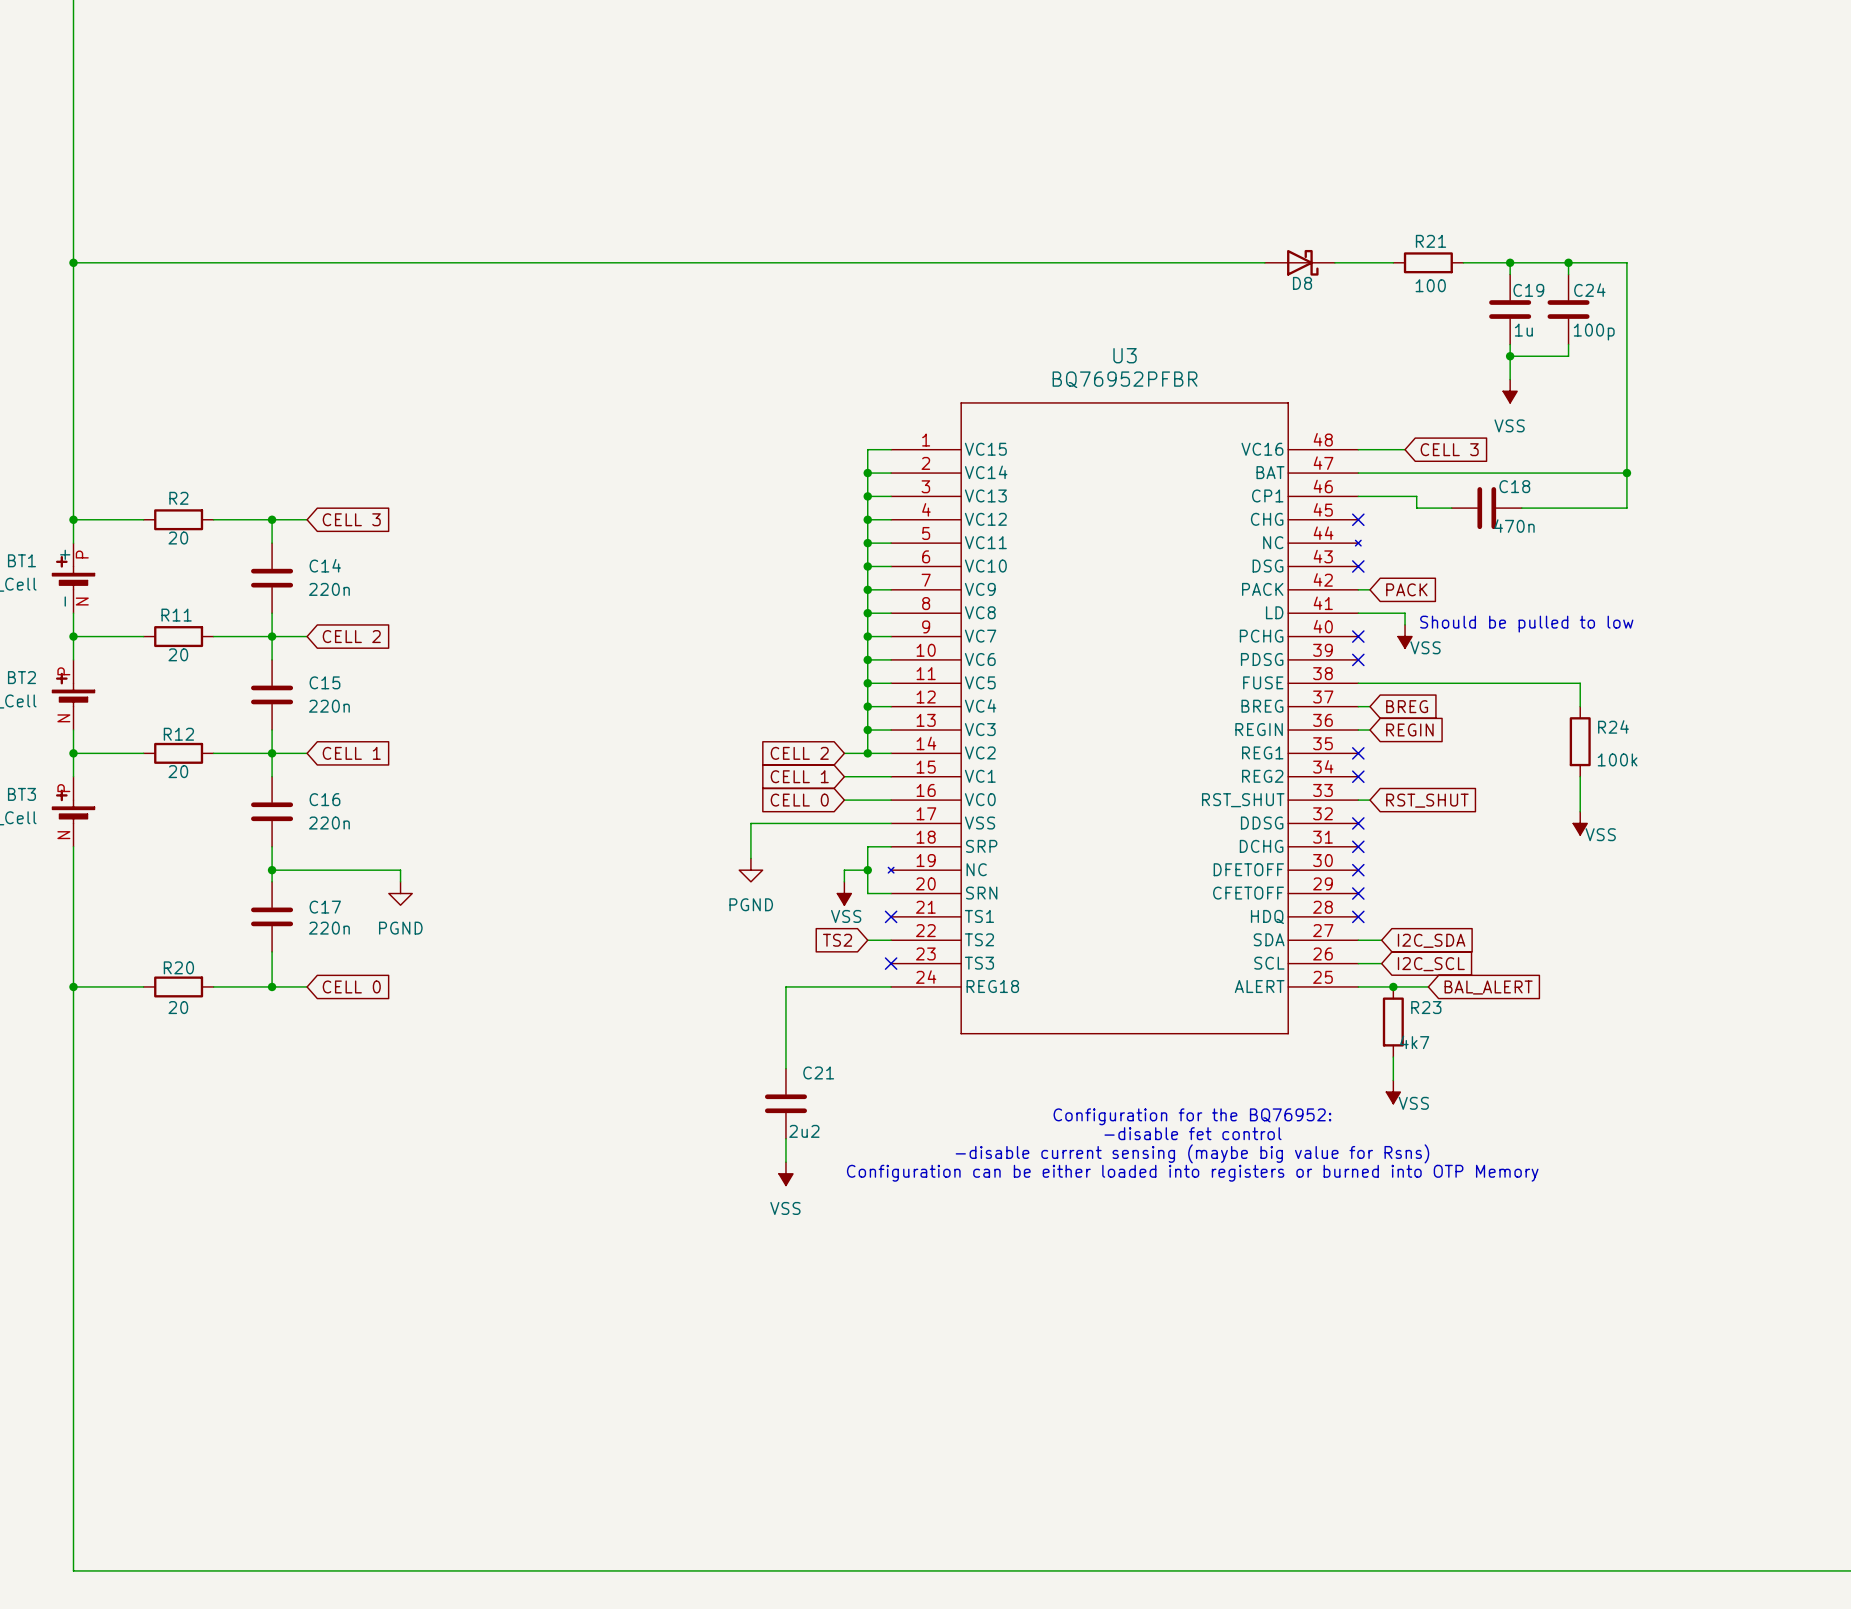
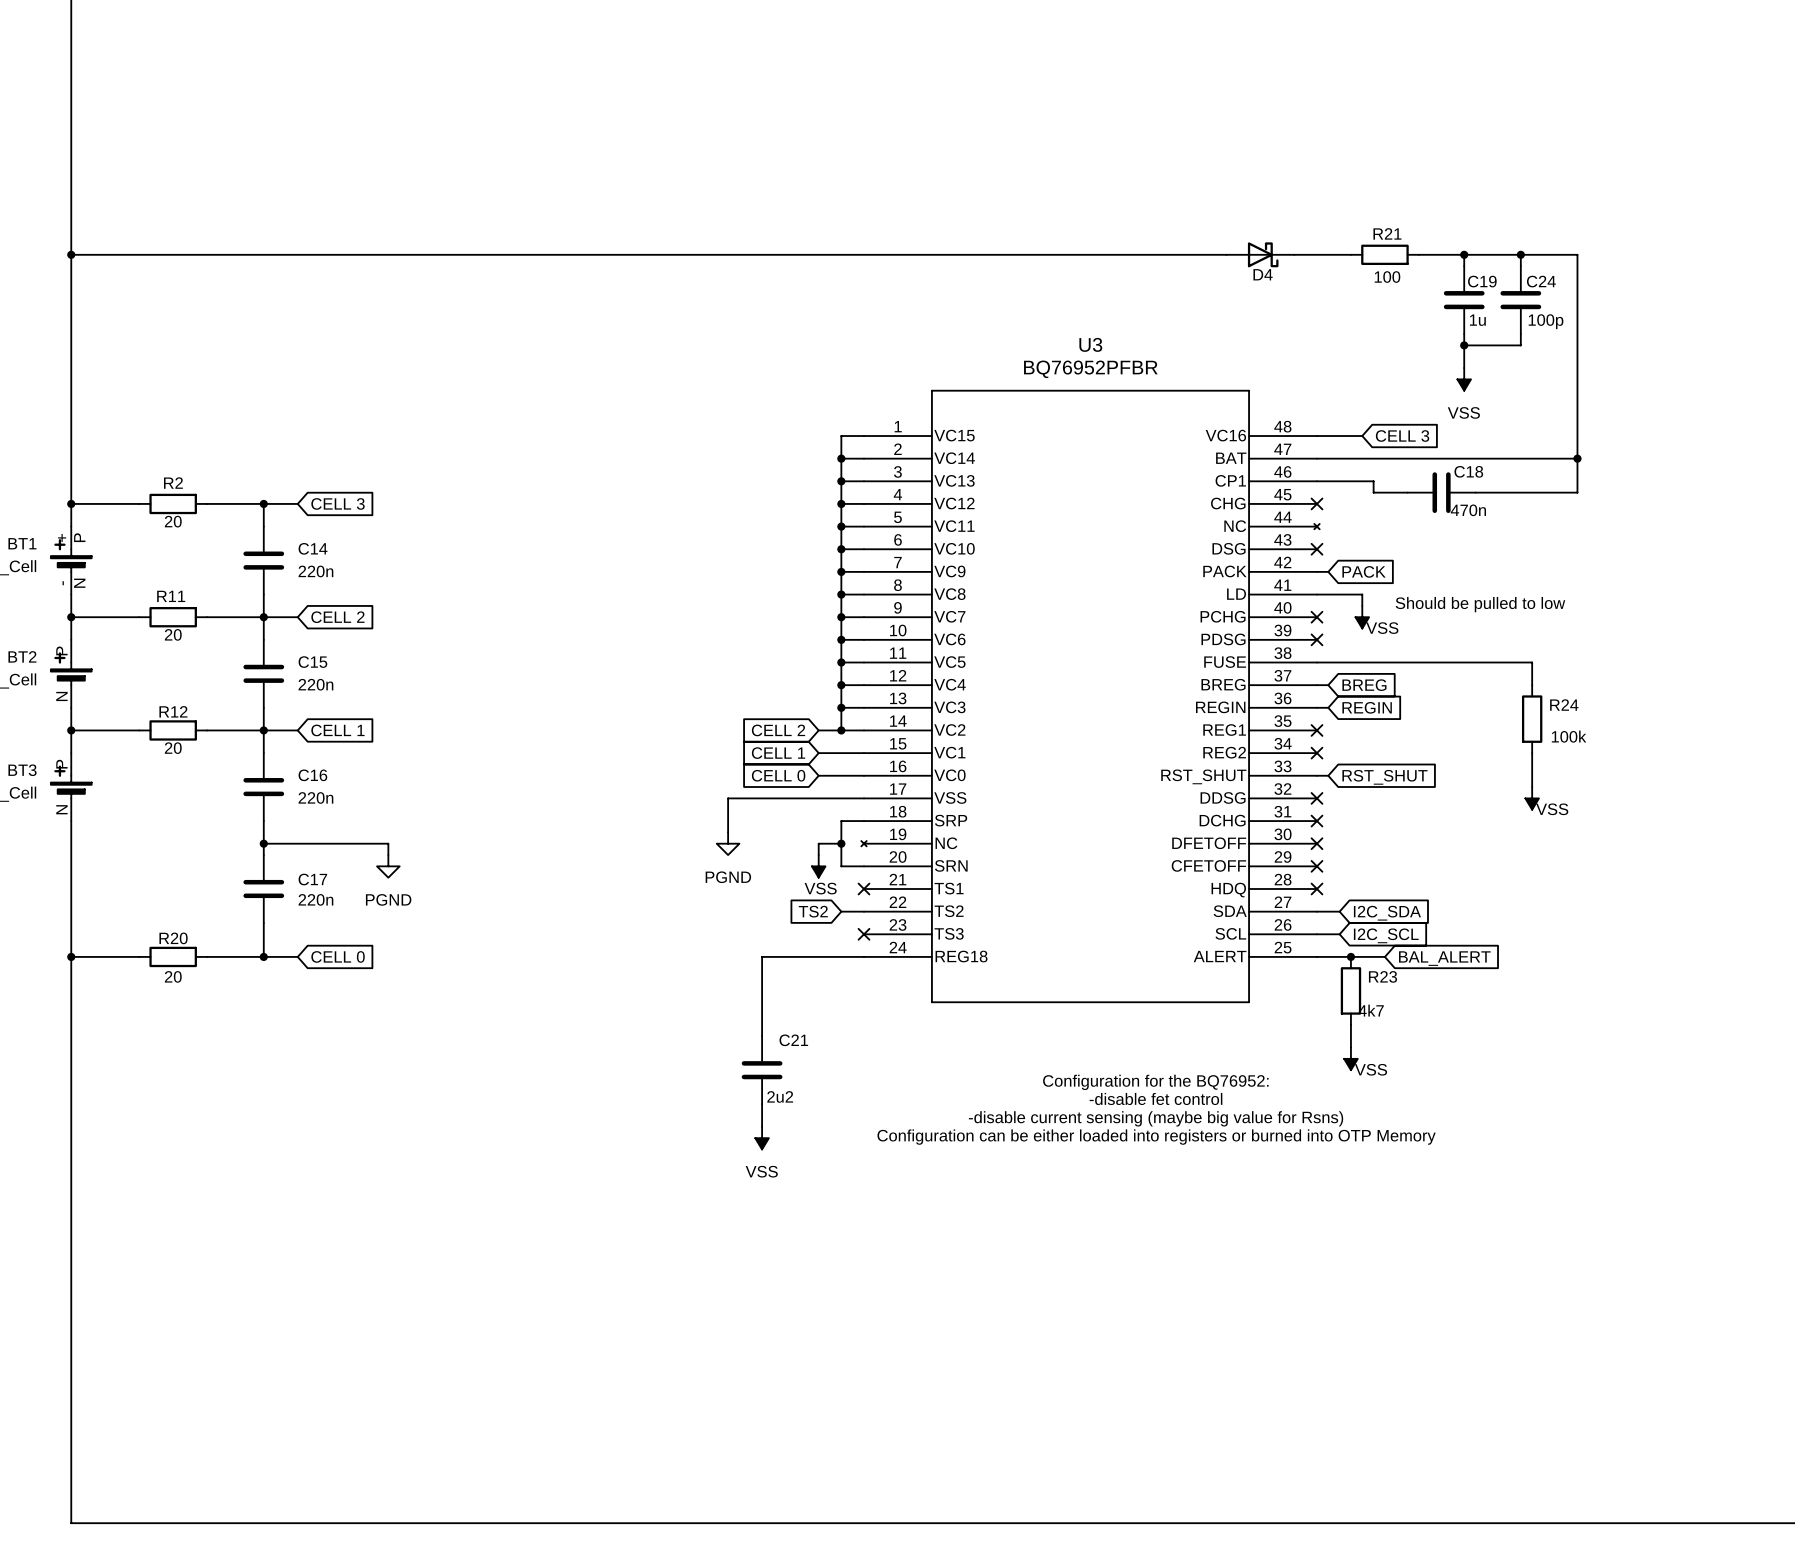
D8 name: D8 (1302, 283) -> D4 (1263, 274)

